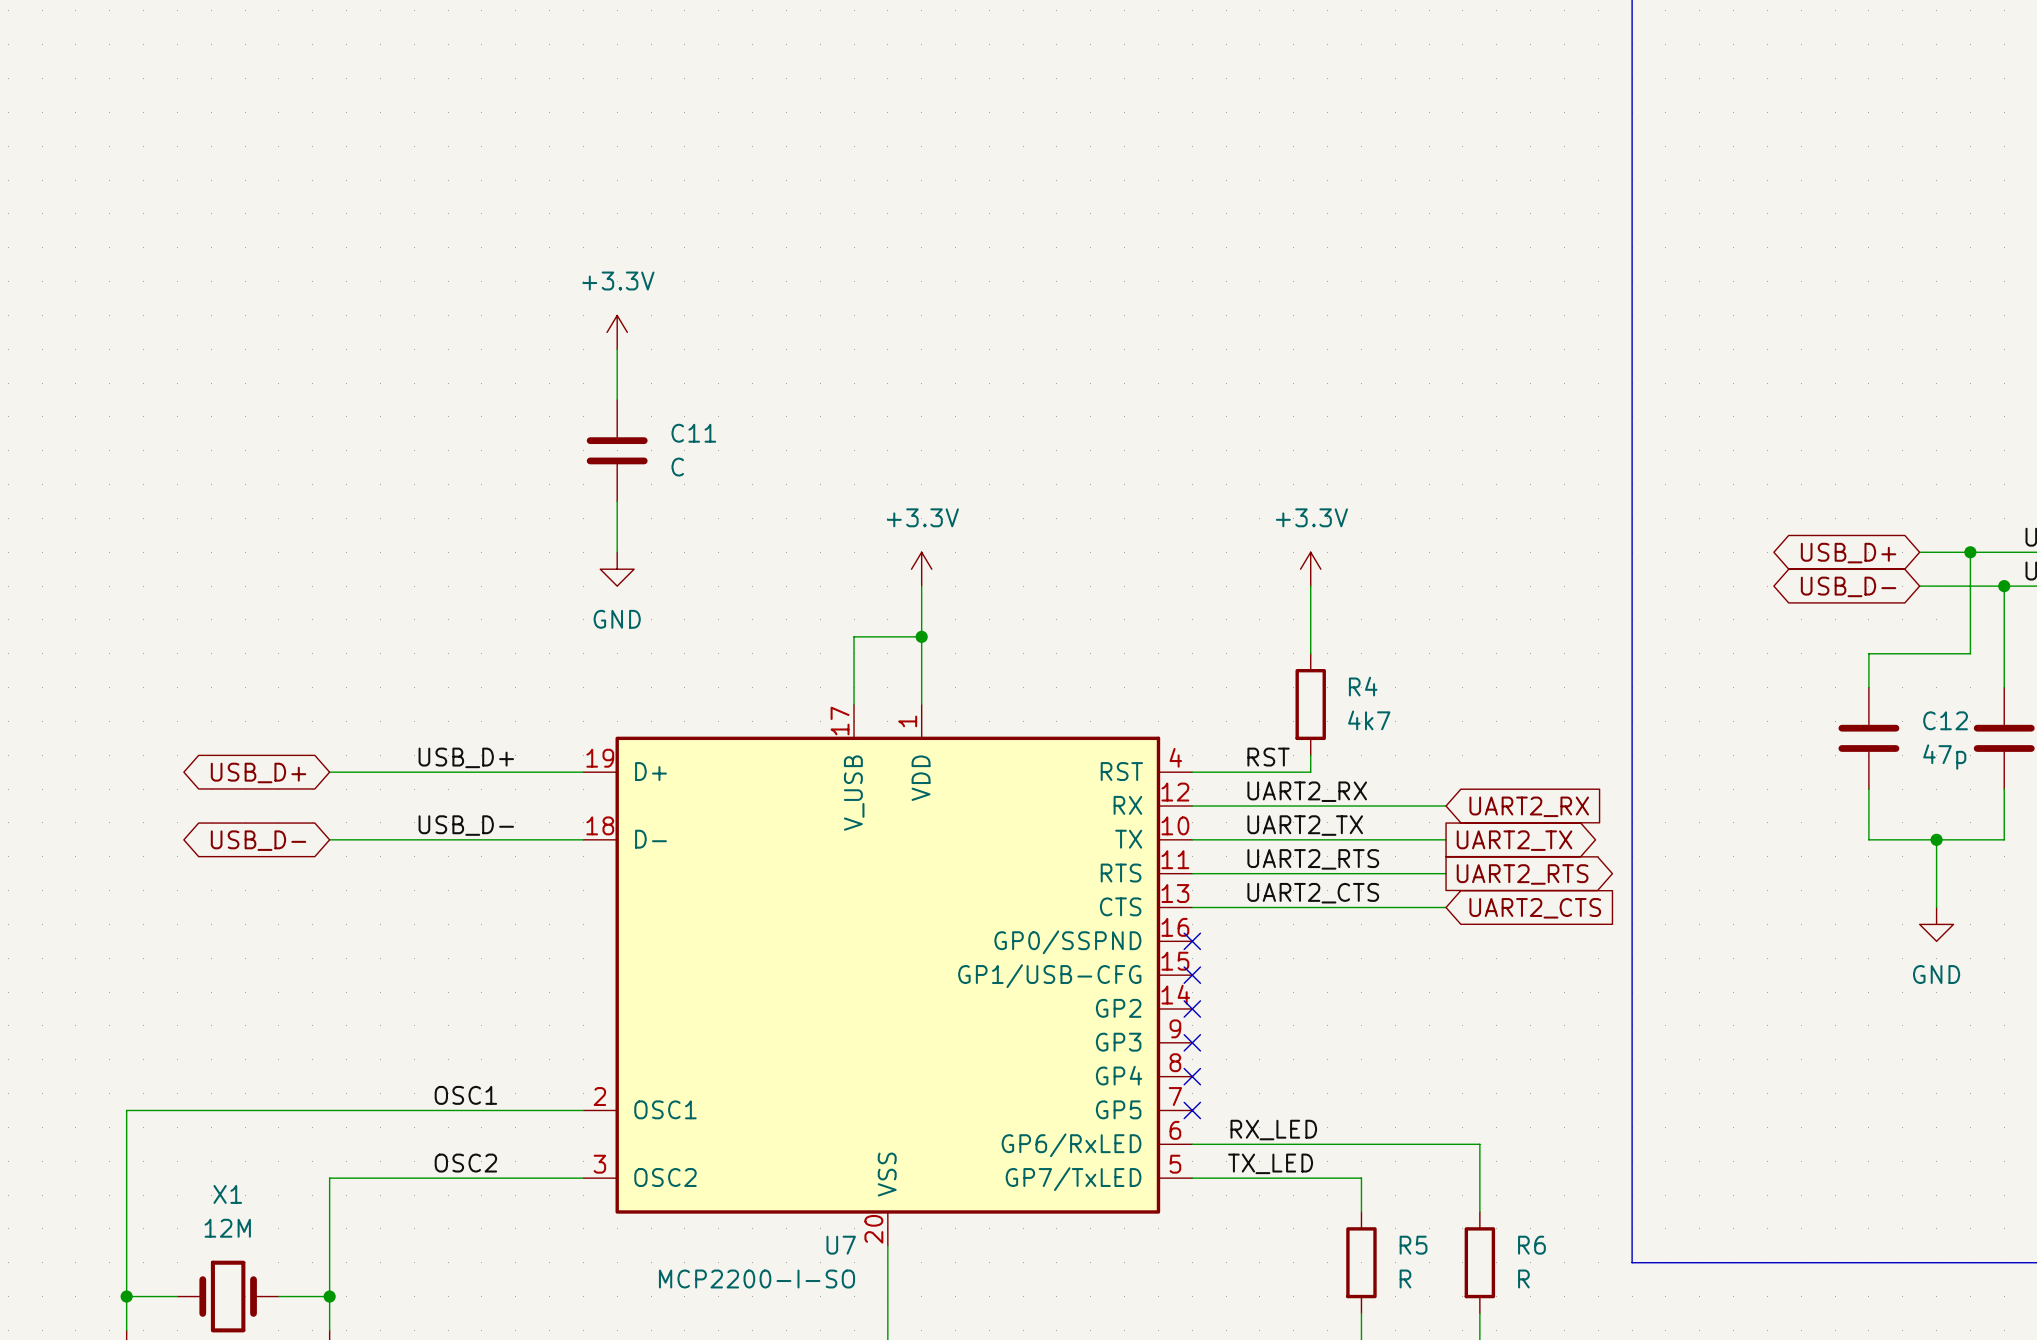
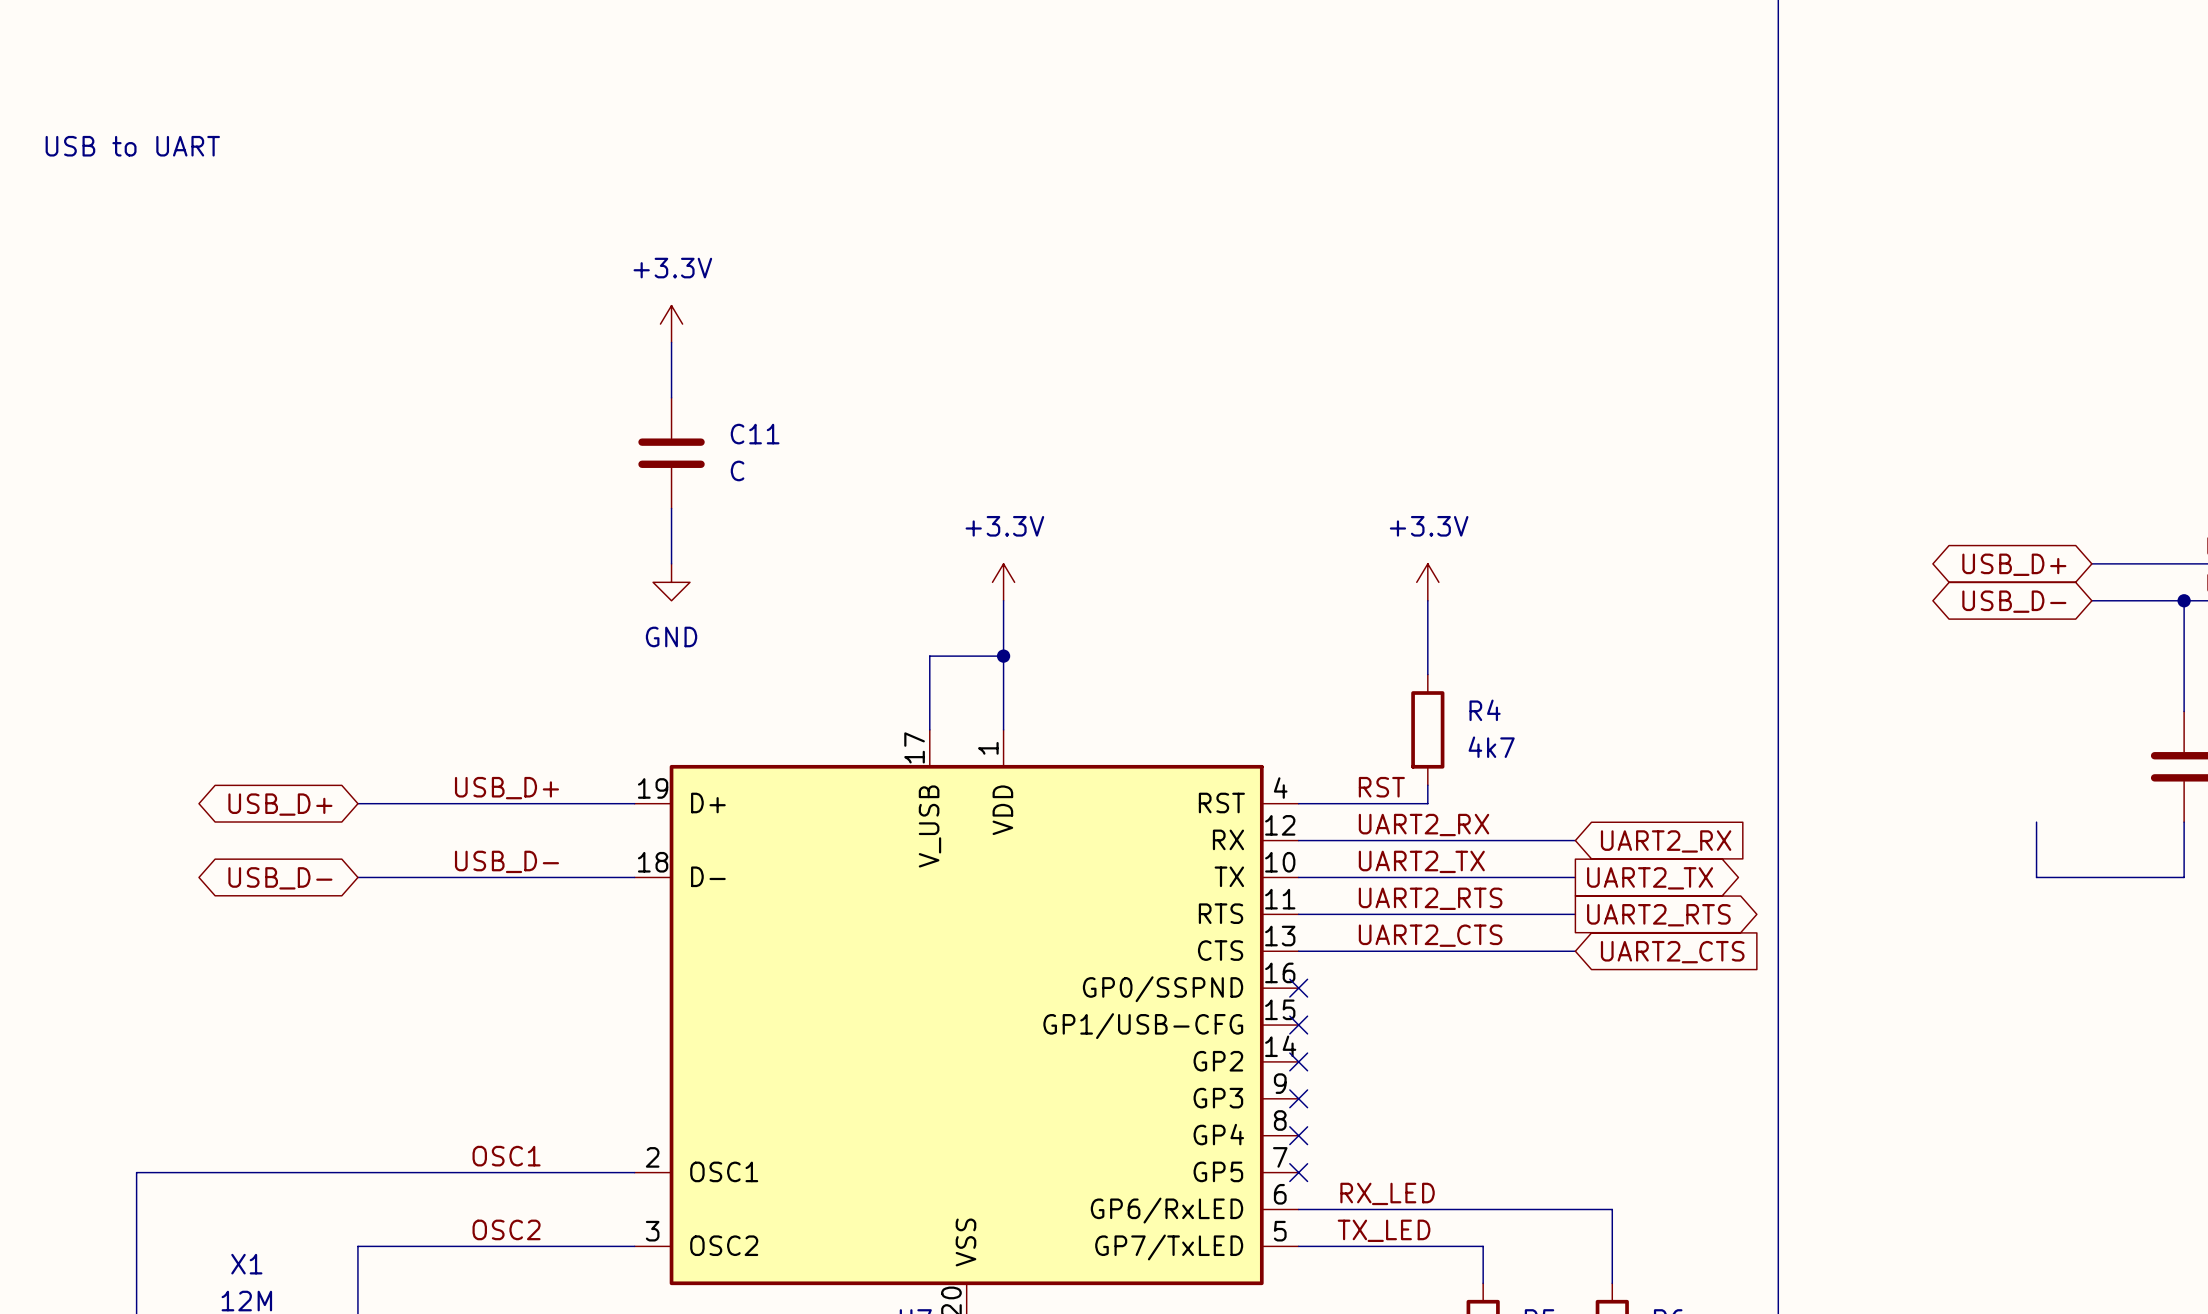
text: none -> USB to UART (132, 146)
wire: (1970, 552) (1970, 653) (1868, 653) (1868, 687) -> none
junction: (1970, 552) -> none
C12: 47p (1868, 738) -> none
wire: (1936, 839) (1936, 907) -> none
junction: (1936, 839) -> none
power symbol: GND (1936, 924) -> none

